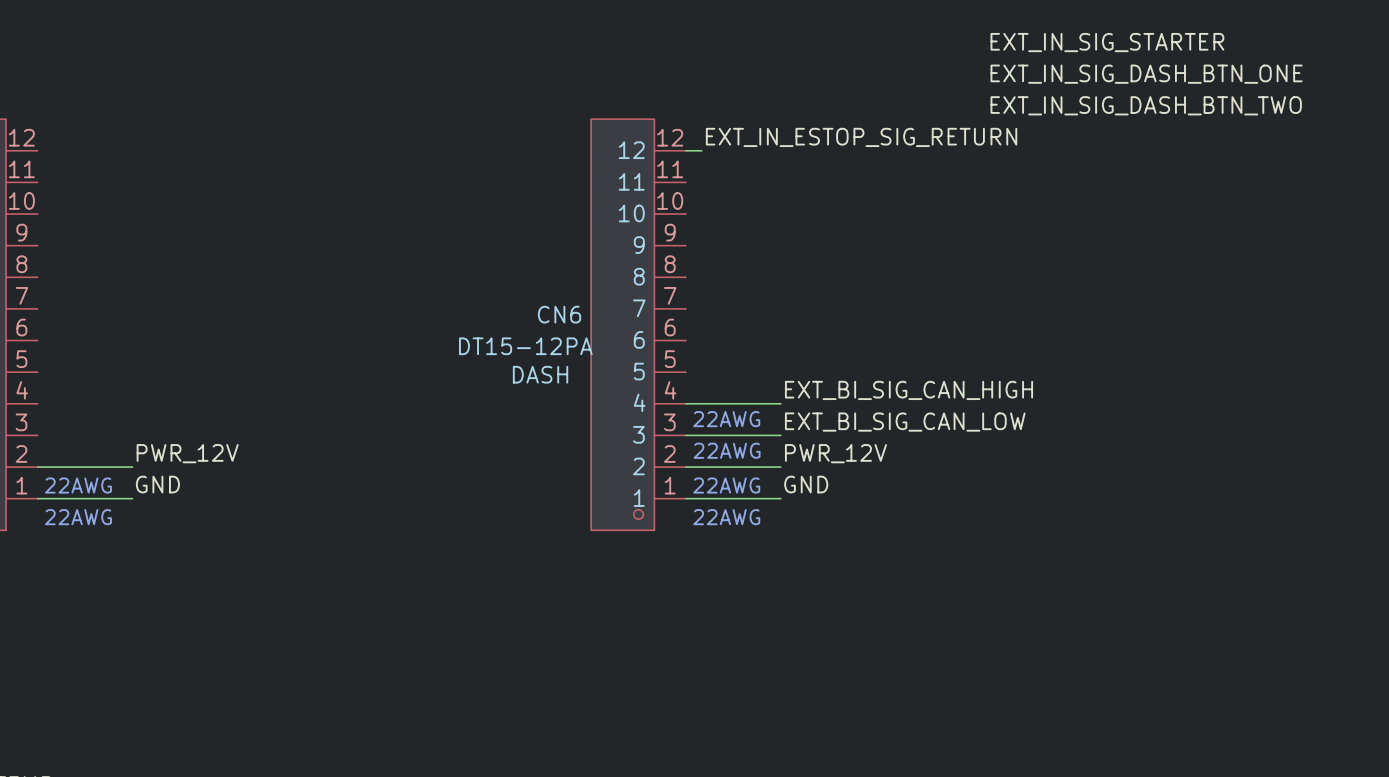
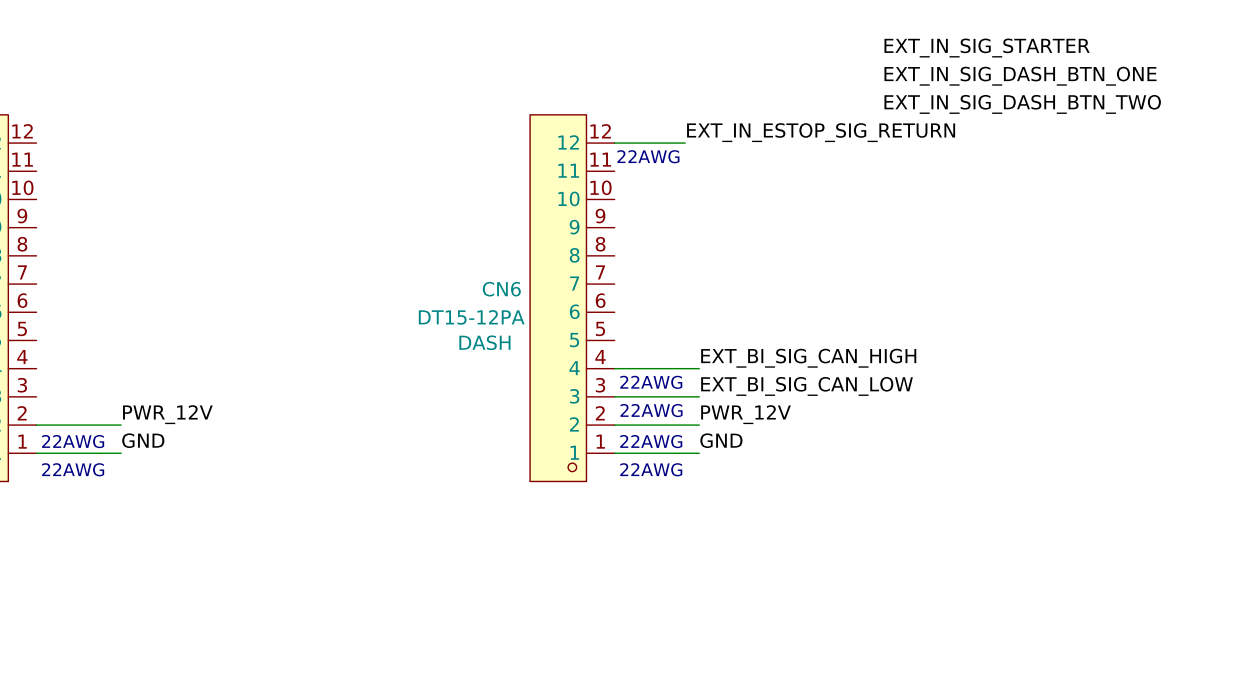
label position: EXT_IN_ESTOP_SIG_RETURN (861, 137) -> EXT_IN_ESTOP_SIG_RETURN (821, 132)
wire: none -> (628, 143) (685, 143)
text: none -> 22AWG (648, 156)

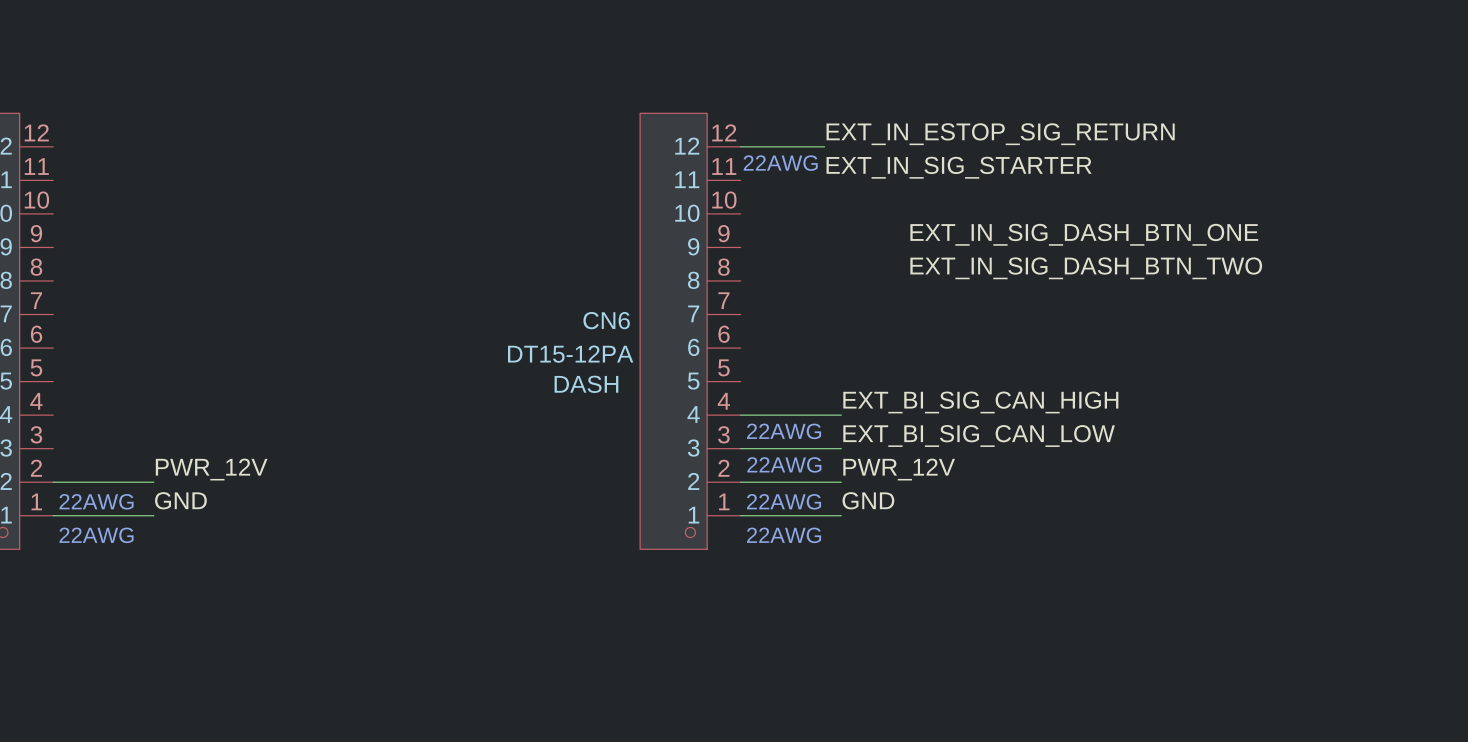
label position: EXT_IN_SIG_STARTER (987, 48) -> EXT_IN_SIG_STARTER (959, 167)
label position: EXT_IN_SIG_DASH_BTN_ONE (1020, 76) -> EXT_IN_SIG_DASH_BTN_ONE (1084, 234)
label position: EXT_IN_SIG_DASH_BTN_TWO (1022, 104) -> EXT_IN_SIG_DASH_BTN_TWO (1086, 268)

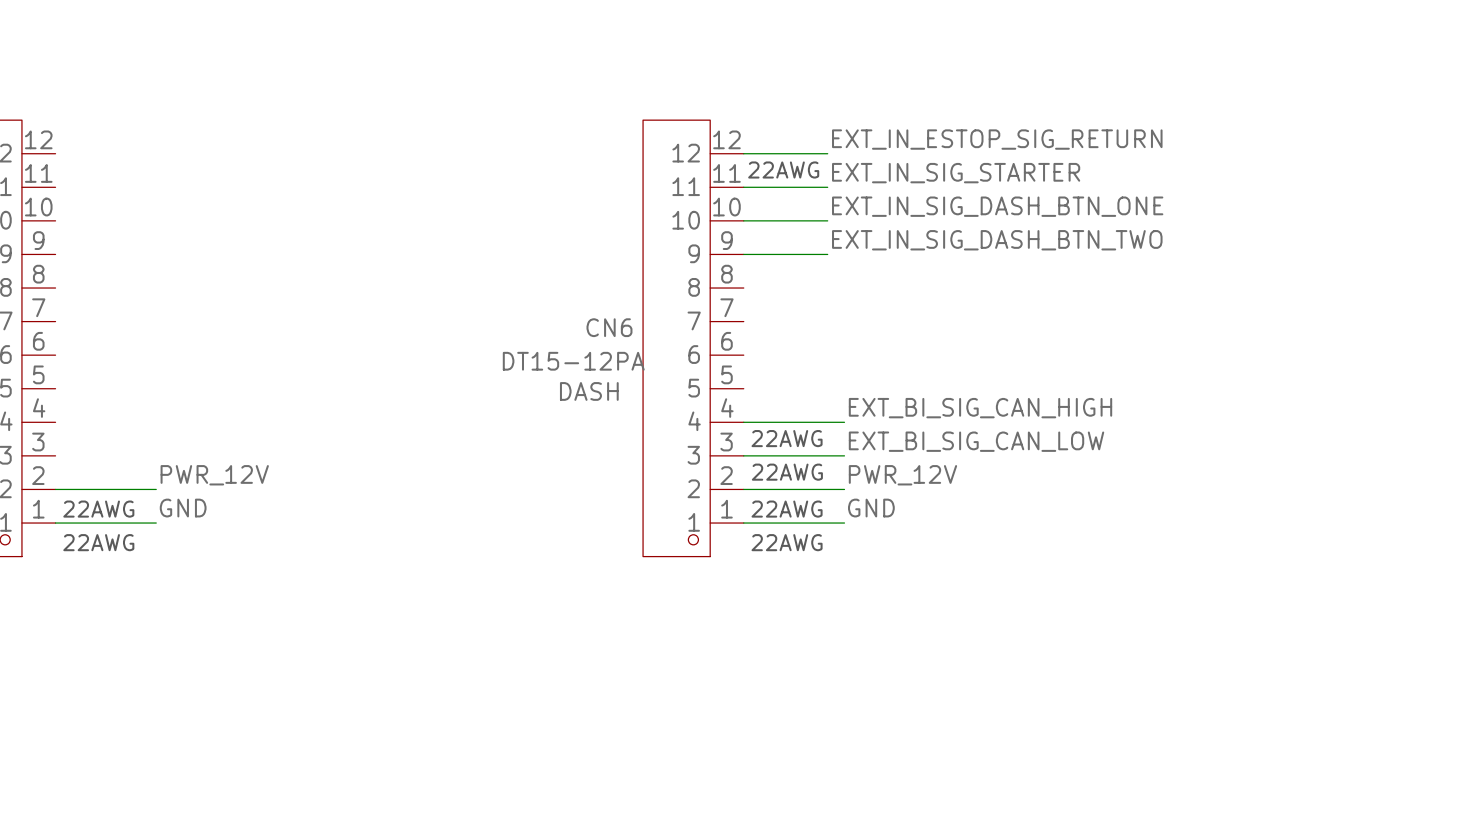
wire: none -> (743, 187) (827, 187)
wire: none -> (743, 220) (827, 220)
label position: EXT_IN_SIG_DASH_BTN_ONE (1084, 234) -> EXT_IN_SIG_DASH_BTN_ONE (997, 206)
wire: none -> (743, 254) (827, 254)
label position: EXT_IN_SIG_DASH_BTN_TWO (1086, 268) -> EXT_IN_SIG_DASH_BTN_TWO (997, 240)

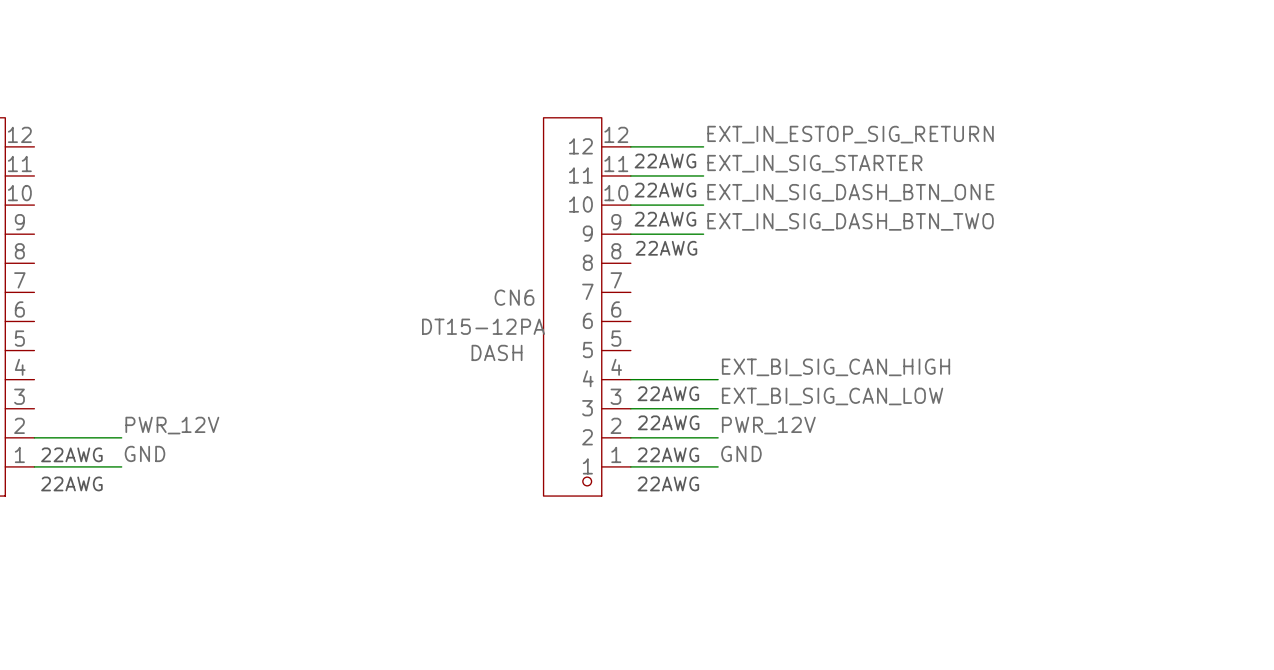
text: none -> 22AWG (665, 190)
text: none -> 22AWG (665, 219)
text: none -> 22AWG (666, 248)

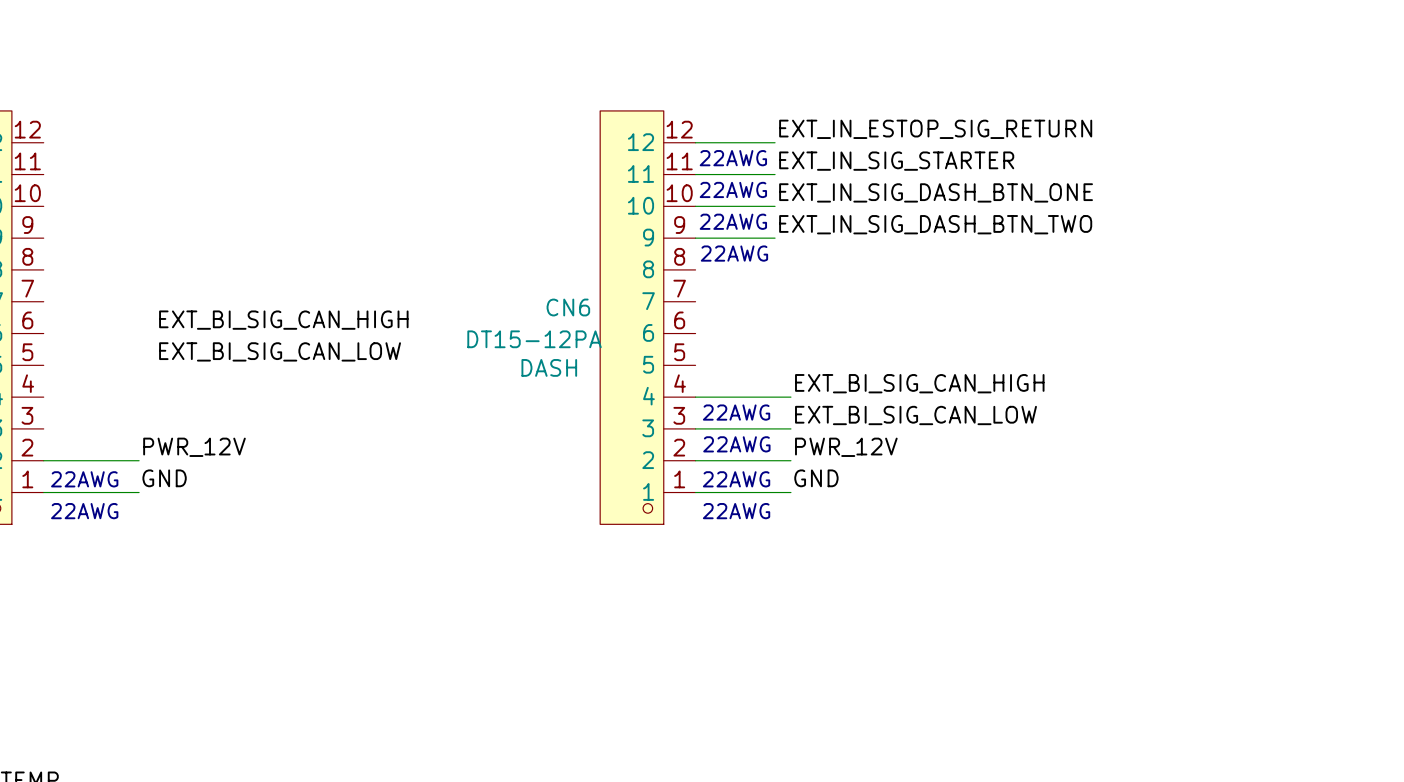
label: none -> EXT_BI_SIG_CAN_HIGH (283, 320)
label: none -> EXT_BI_SIG_CAN_LOW (280, 351)

